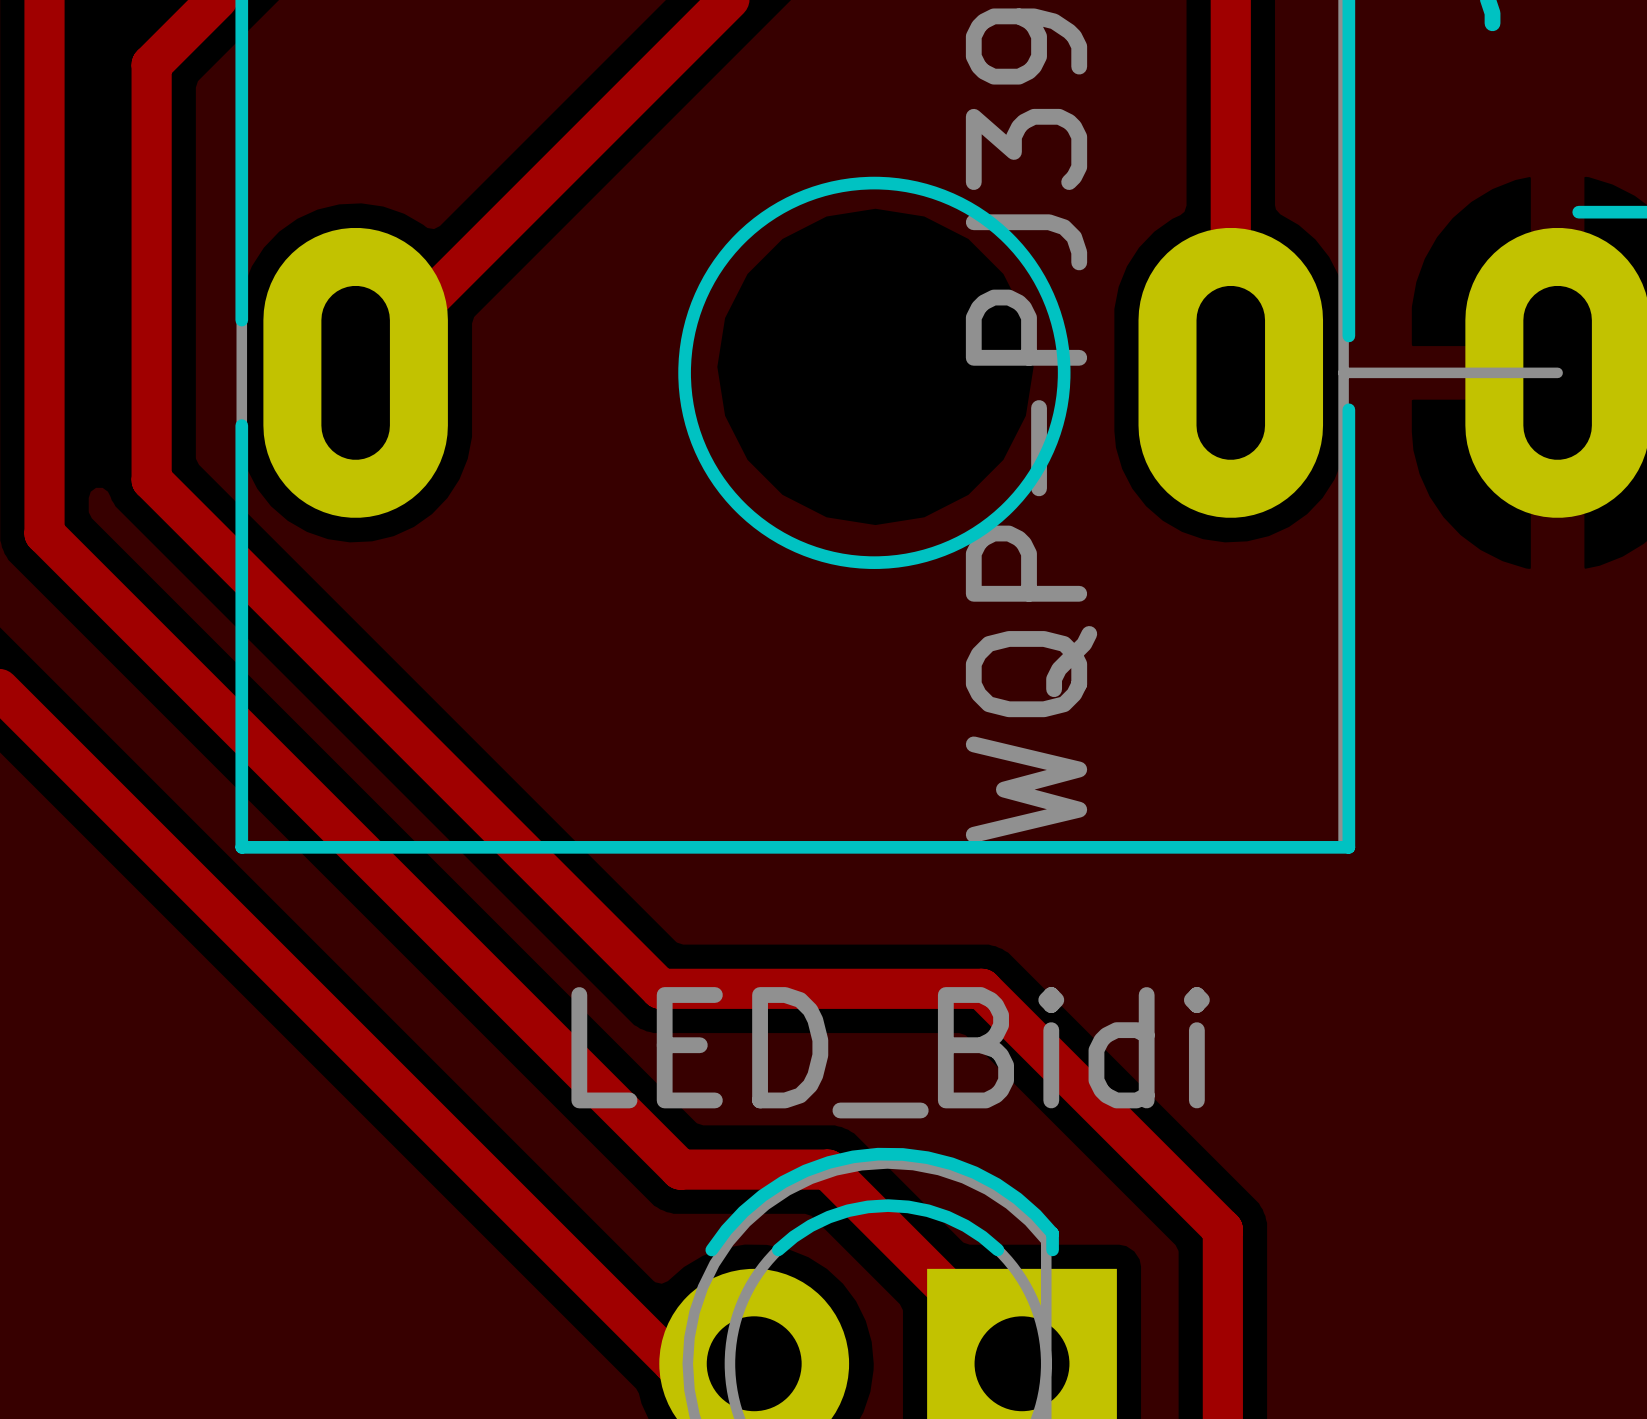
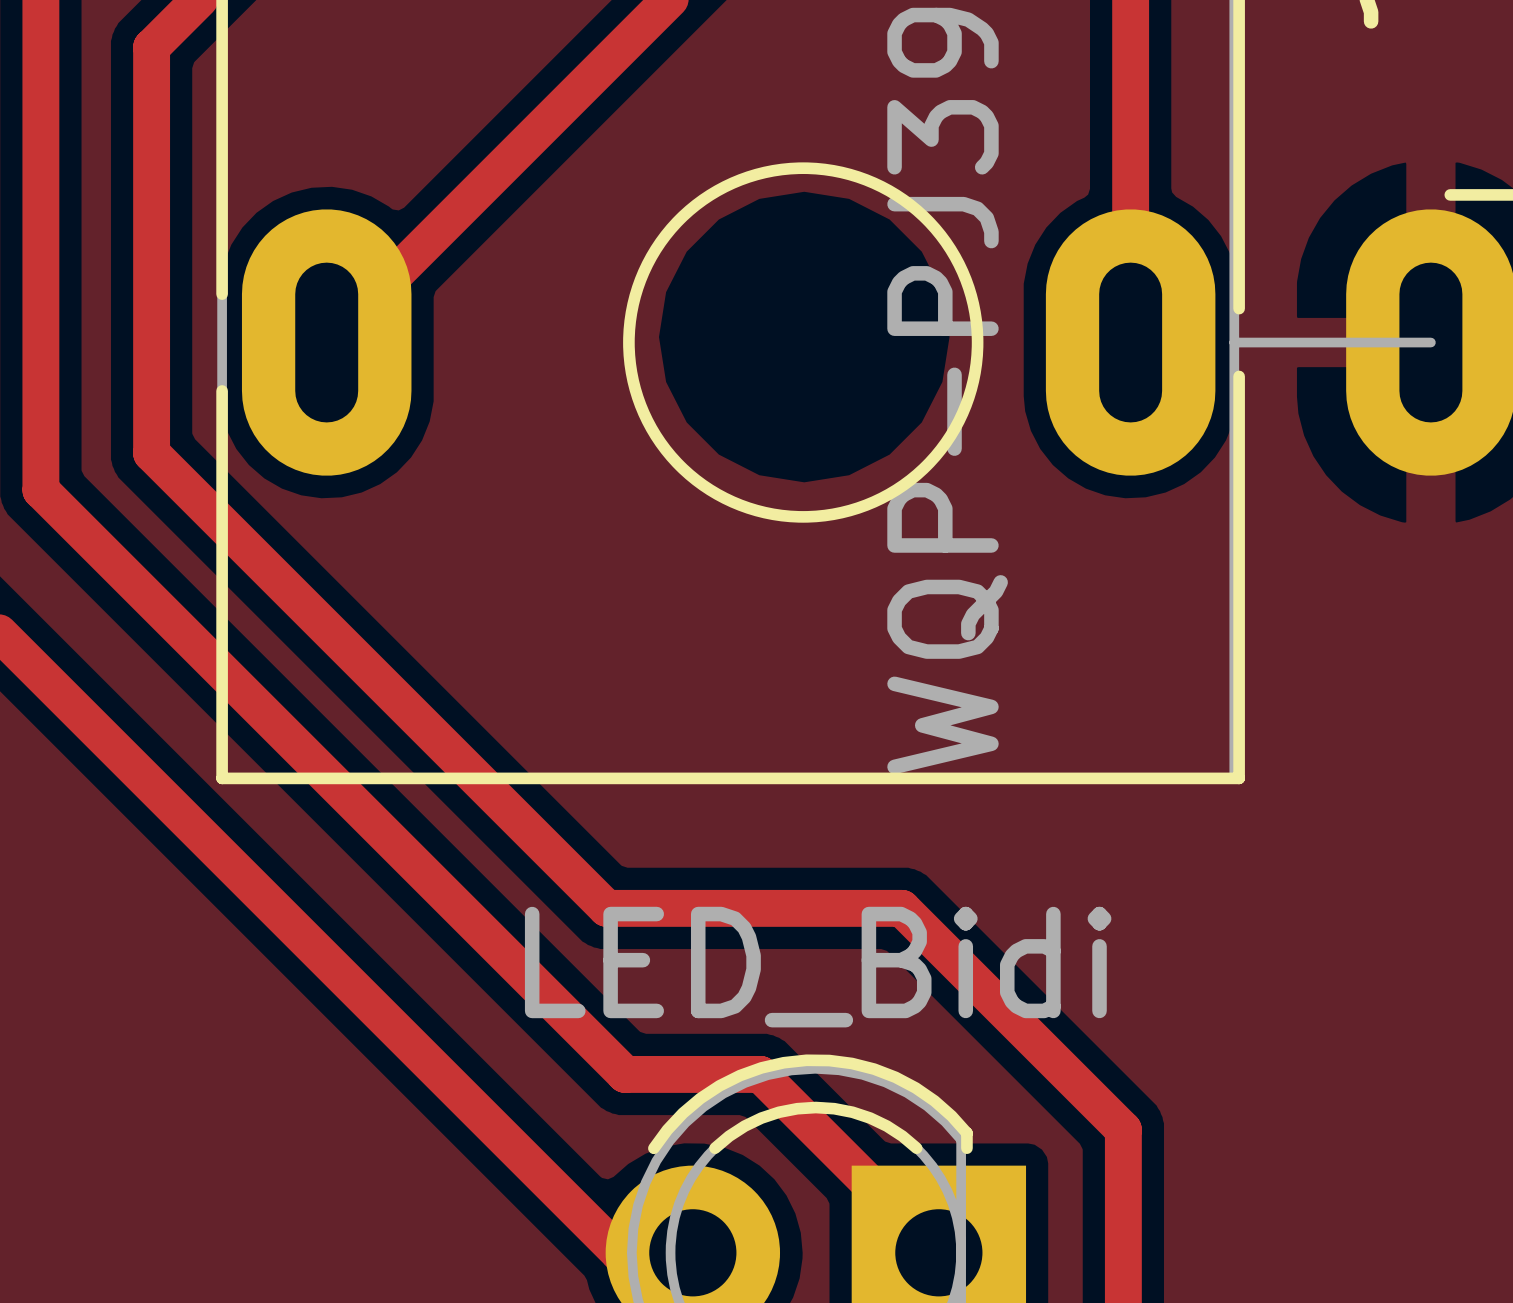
track: (165, 51) (151, 64) (151, 479) (165, 493) -> (151, 47) (151, 453)

